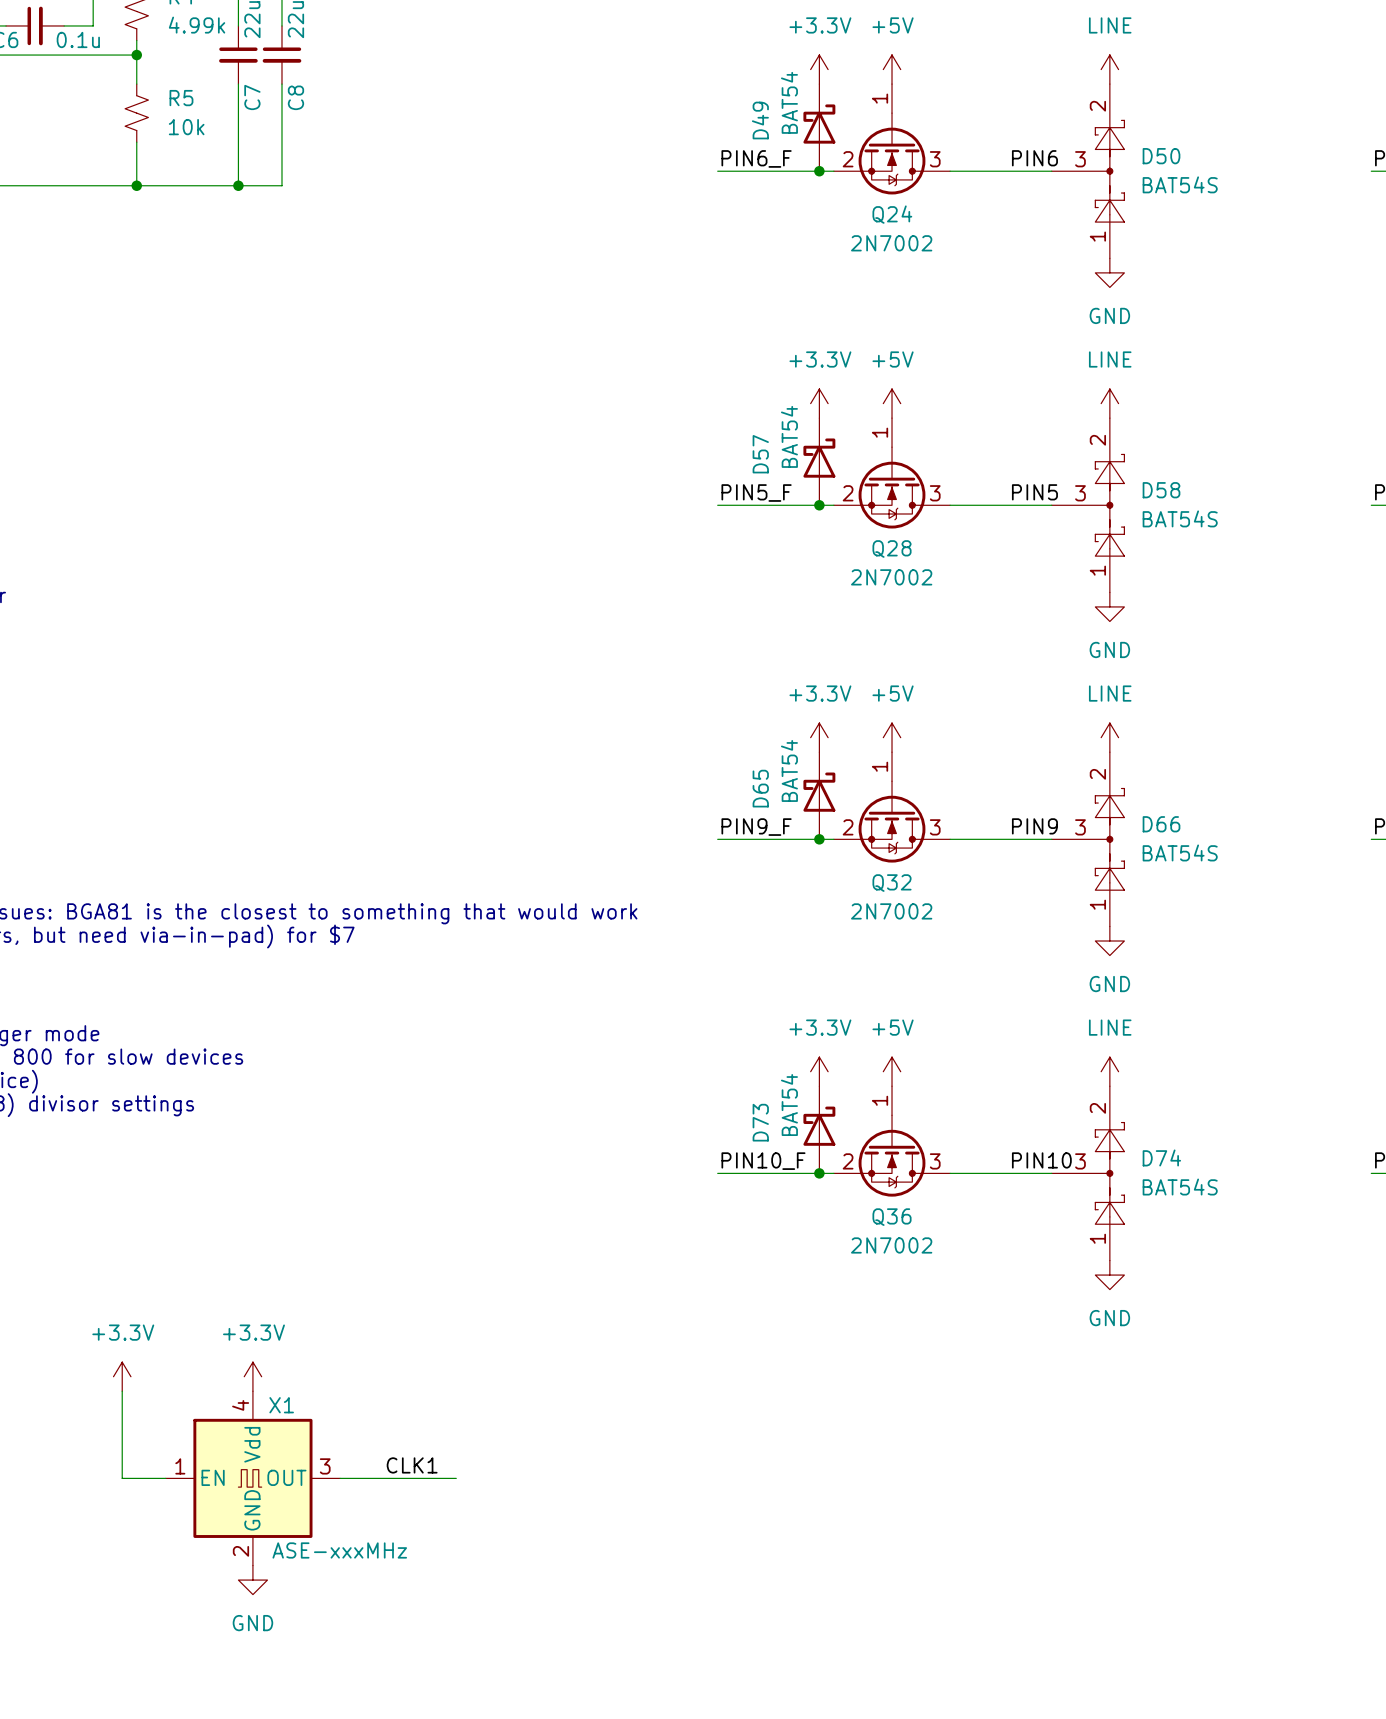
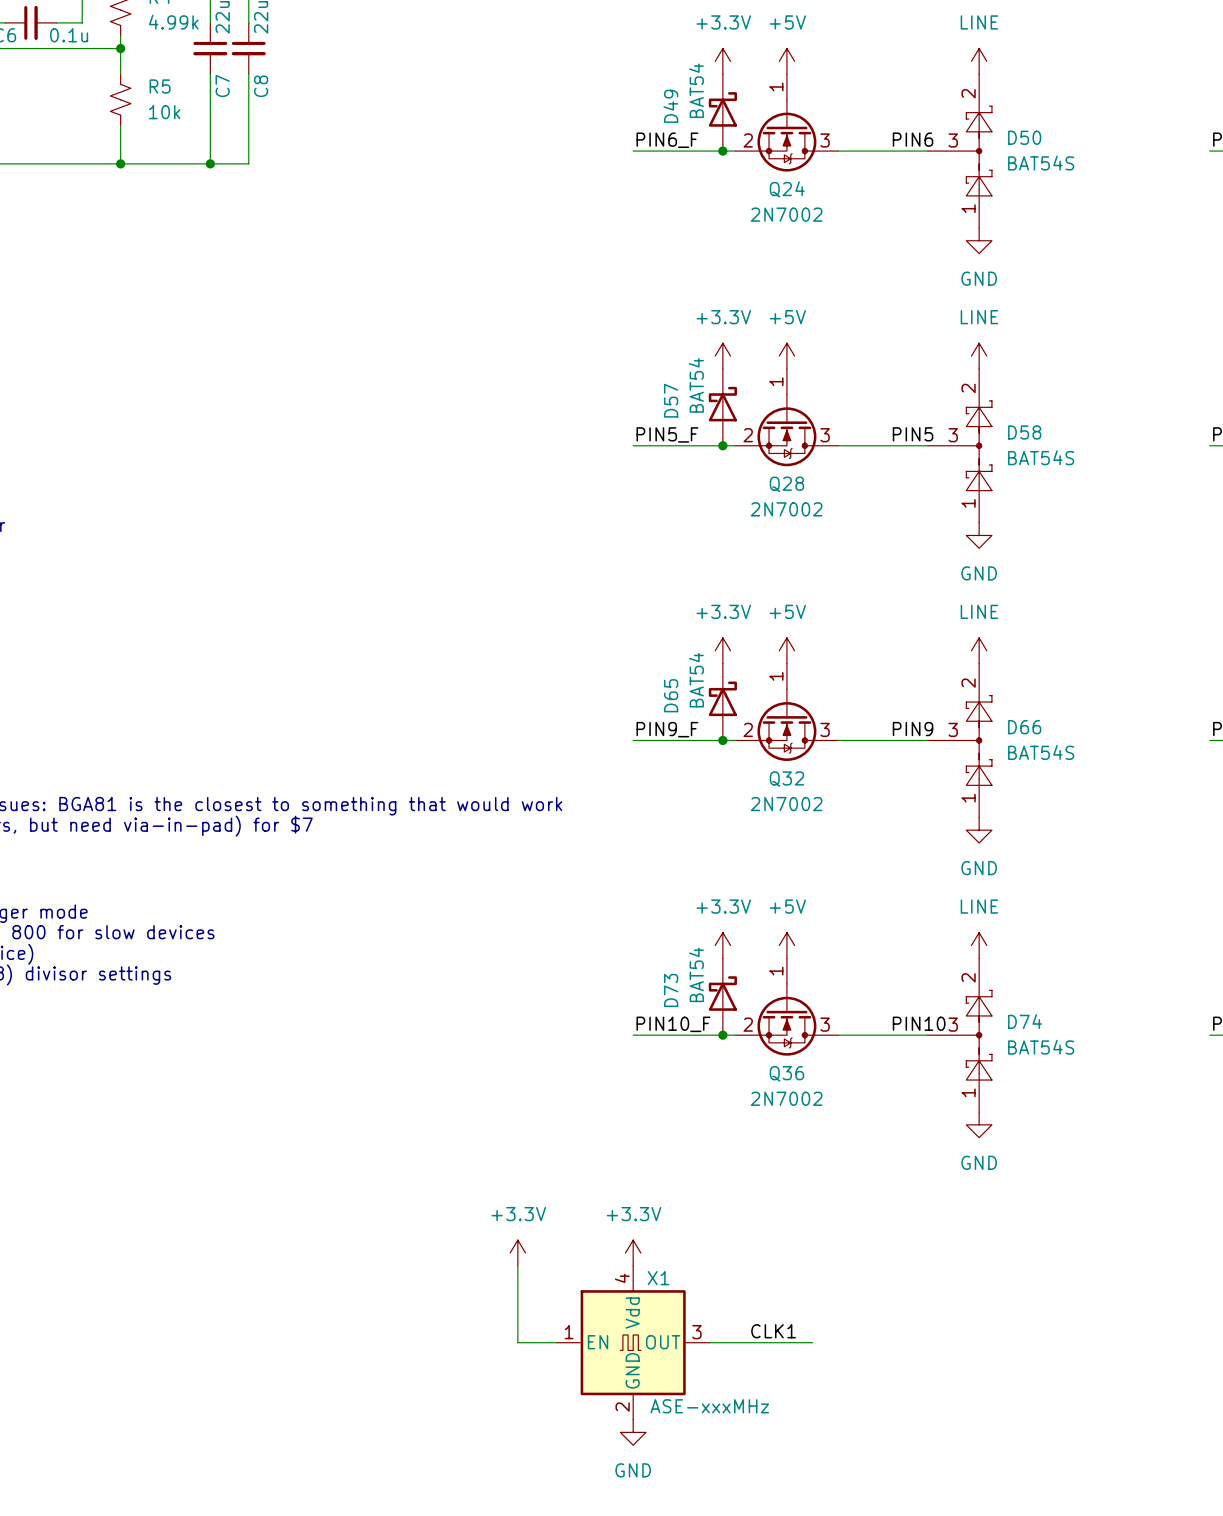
power symbol: +3.3V (122, 1376) -> none
power symbol: +3.3V (252, 1376) -> none
wire: (122, 1391) (122, 1478) (165, 1478) -> none
power symbol: none -> +3.3V (517, 1253)
power symbol: none -> +3.3V (633, 1253)
wire: none -> (517, 1265) (517, 1342) (556, 1342)
label: CLK1 (412, 1465) -> none
X1 position: (252, 1478) -> (633, 1342)
wire: (340, 1478) (456, 1478) -> none
label: none -> CLK1 (773, 1331)
wire: none -> (710, 1342) (812, 1342)
power symbol: GND (252, 1580) -> none
power symbol: none -> GND (633, 1432)

